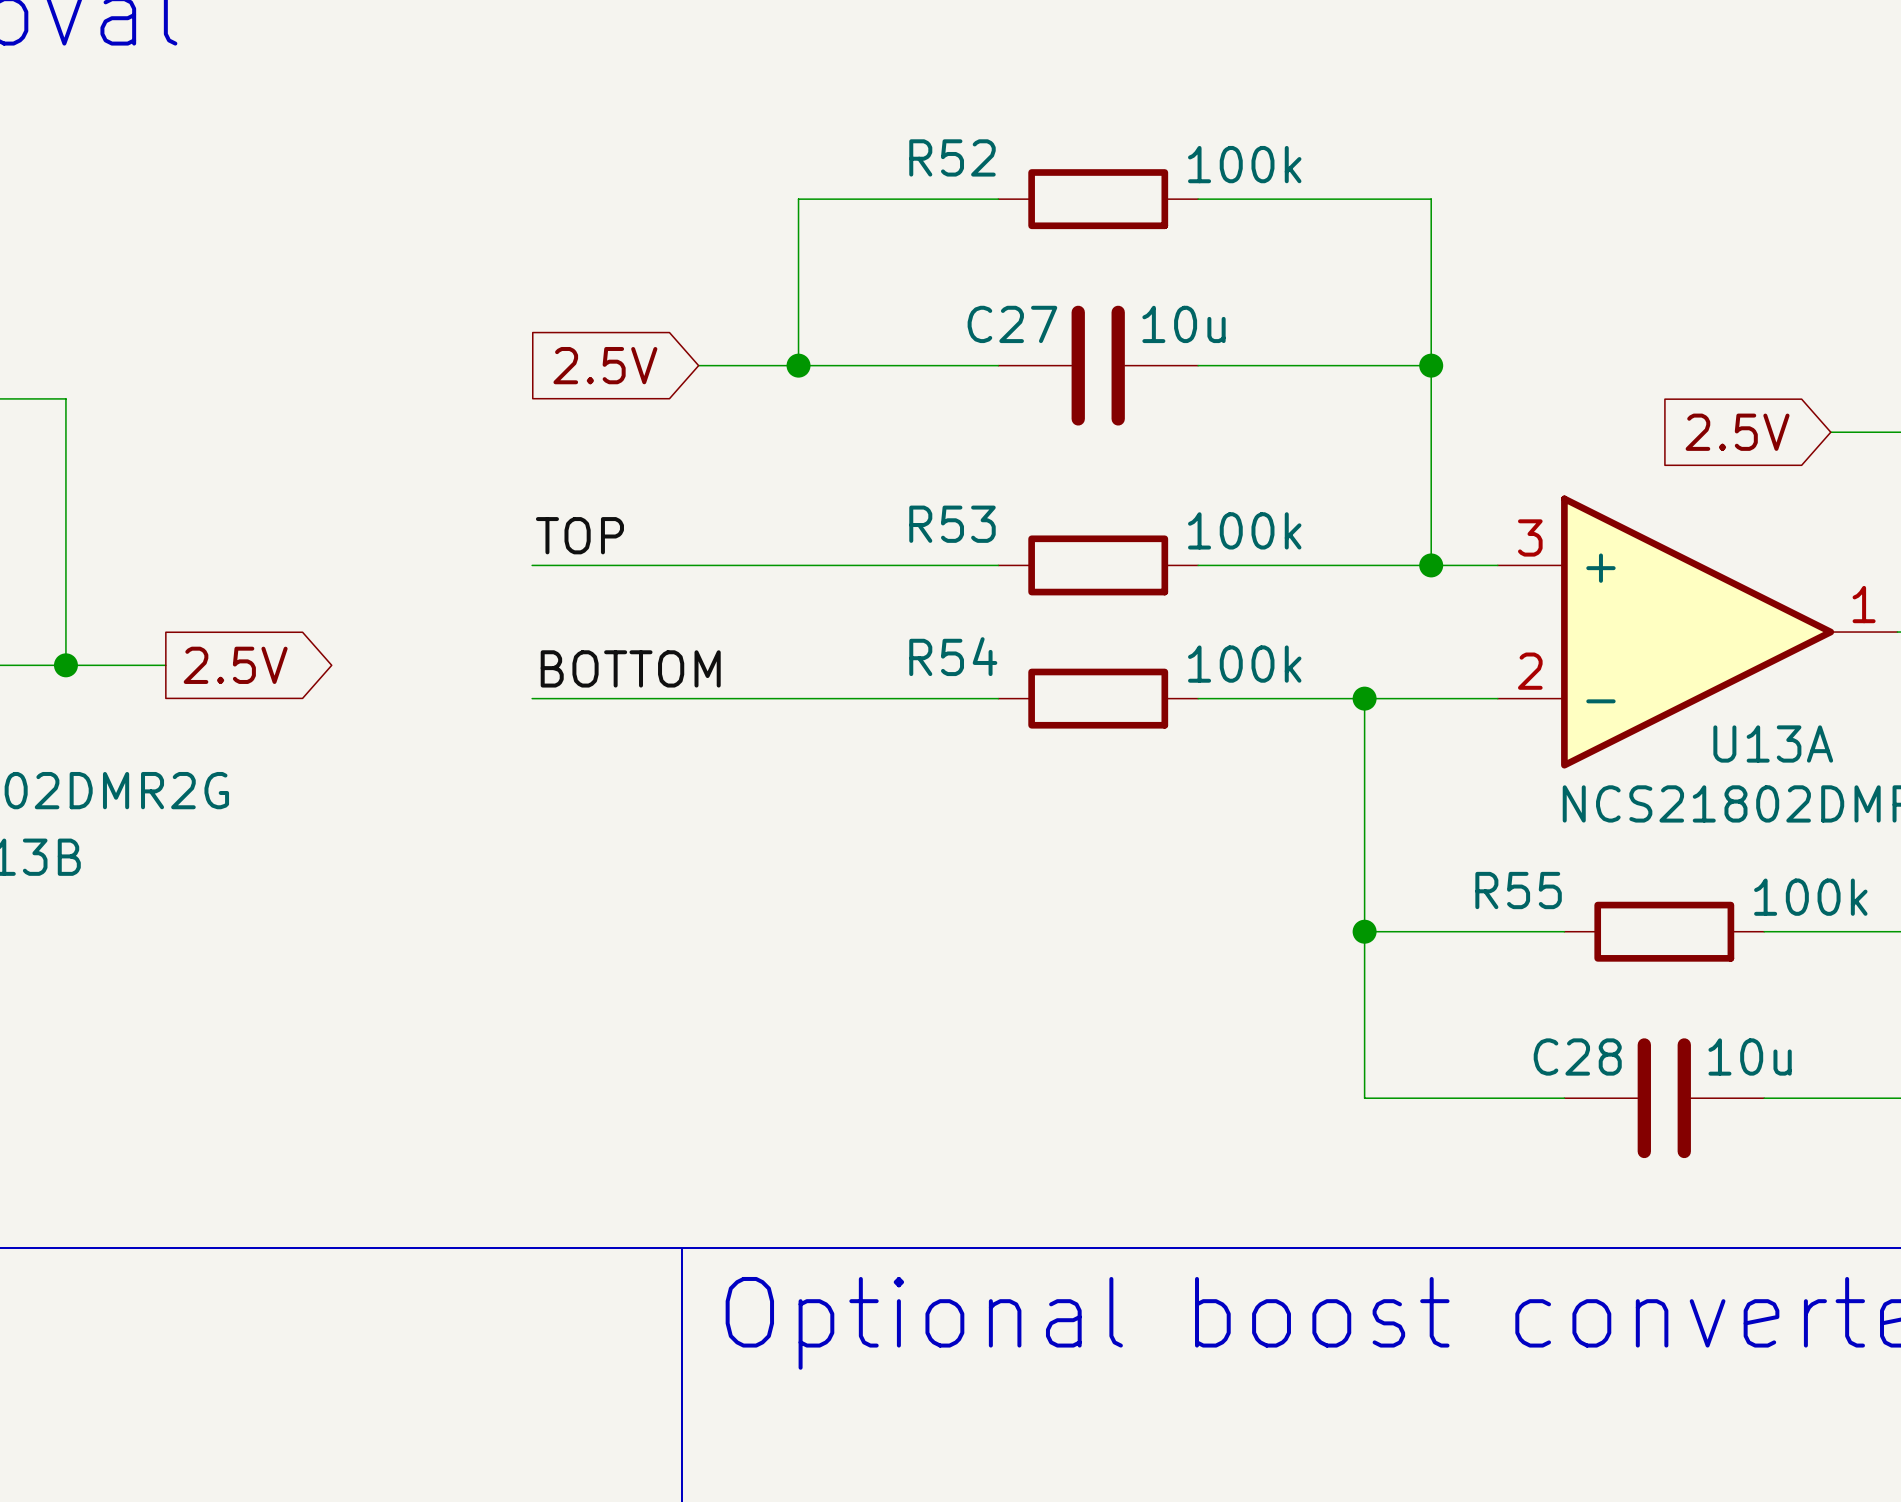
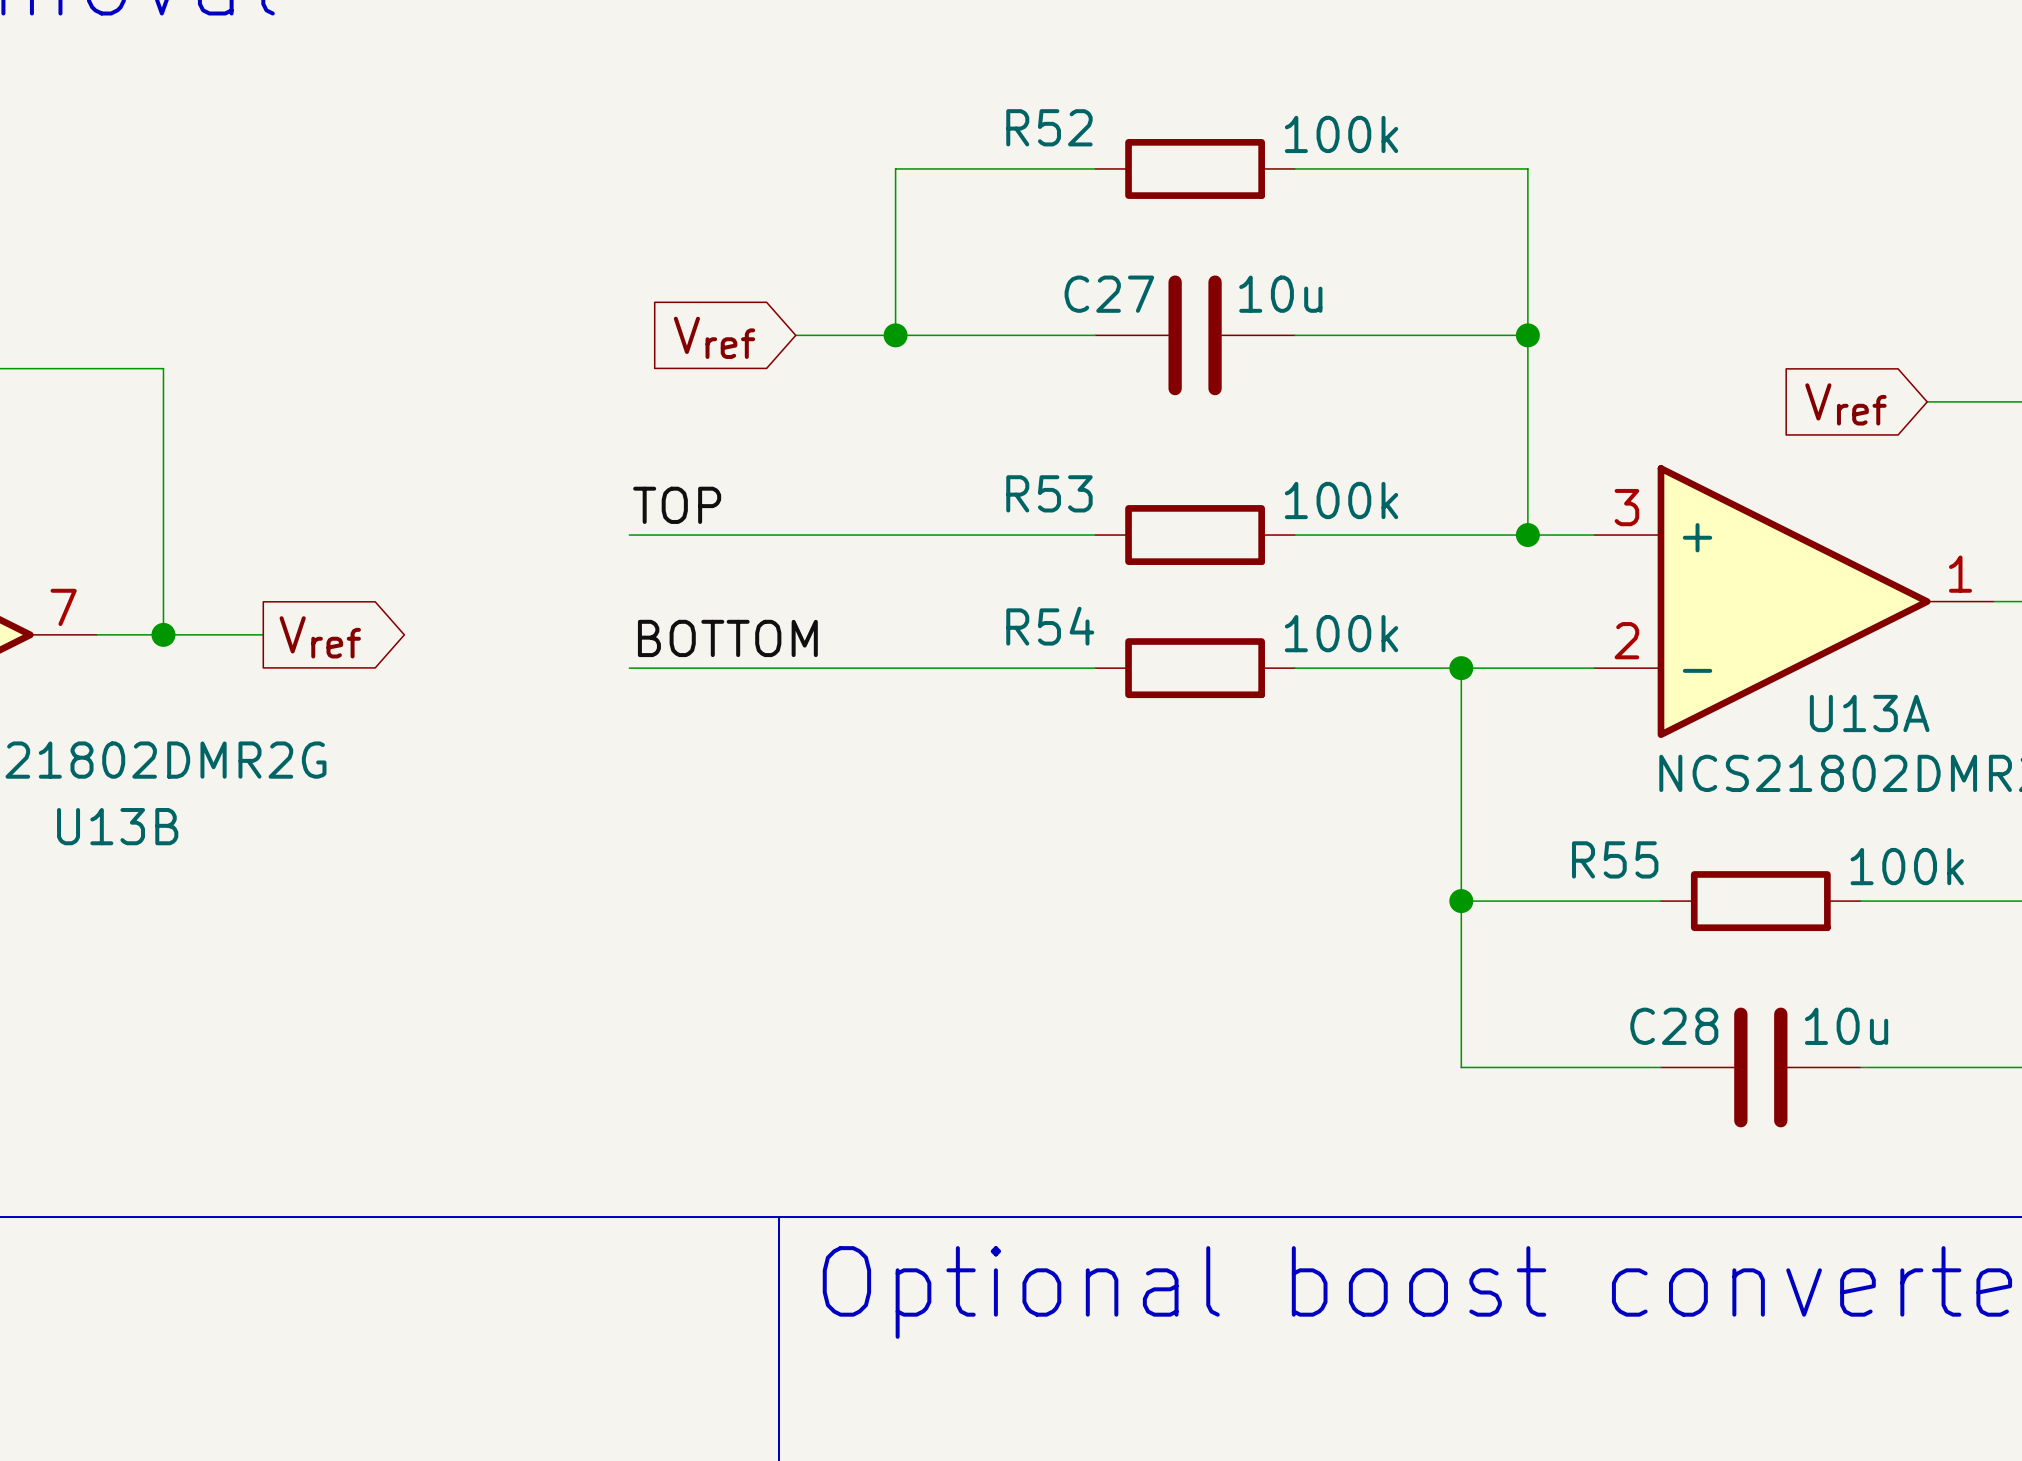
global label: 2.5V (605, 365) -> Vref (714, 337)
global label: 2.5V (1737, 432) -> Vref (1845, 404)
global label: 2.5V (235, 665) -> Vref (320, 637)

